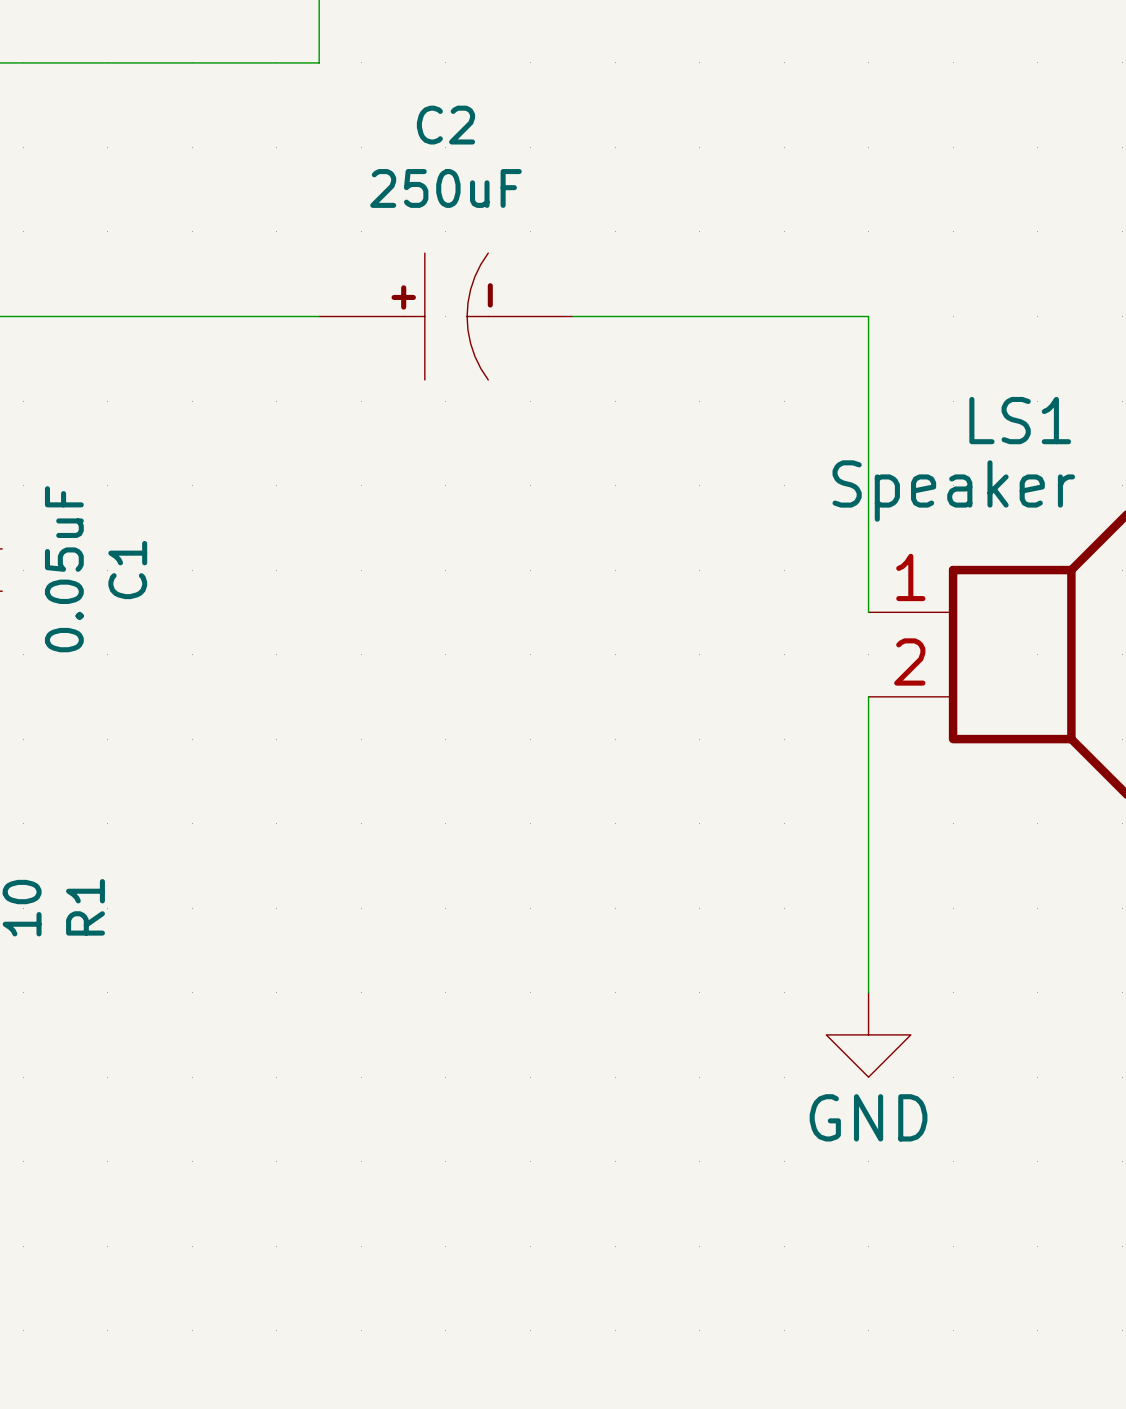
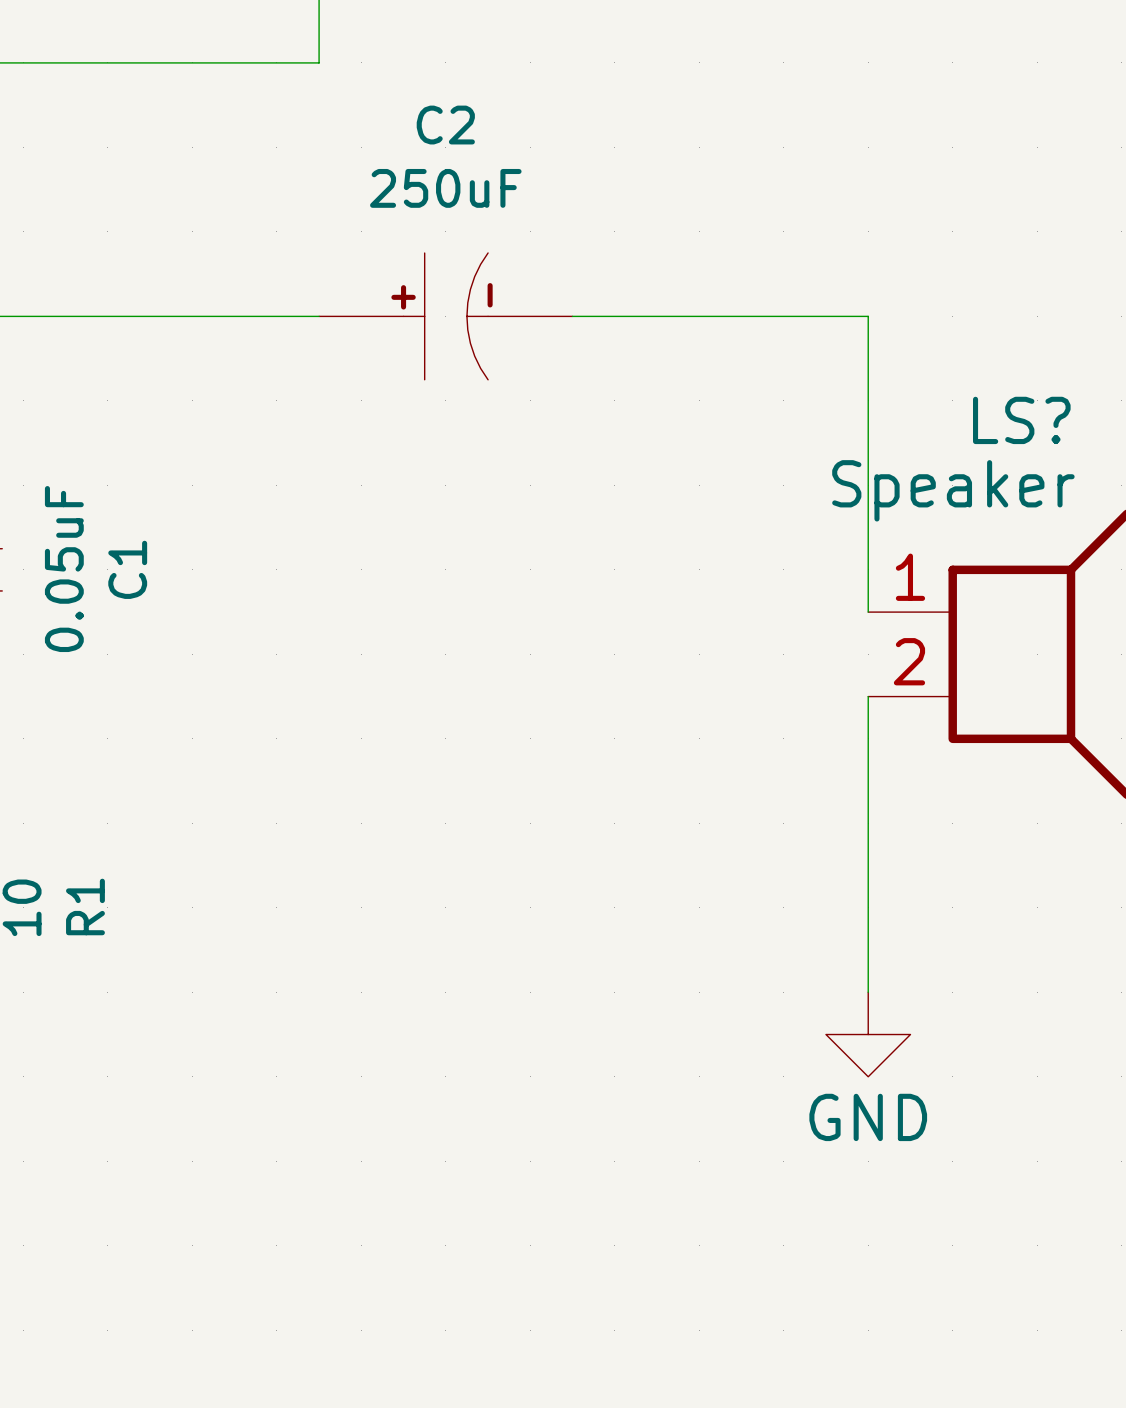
LS1 name: LS1 (1020, 420) -> LS? (1021, 420)

